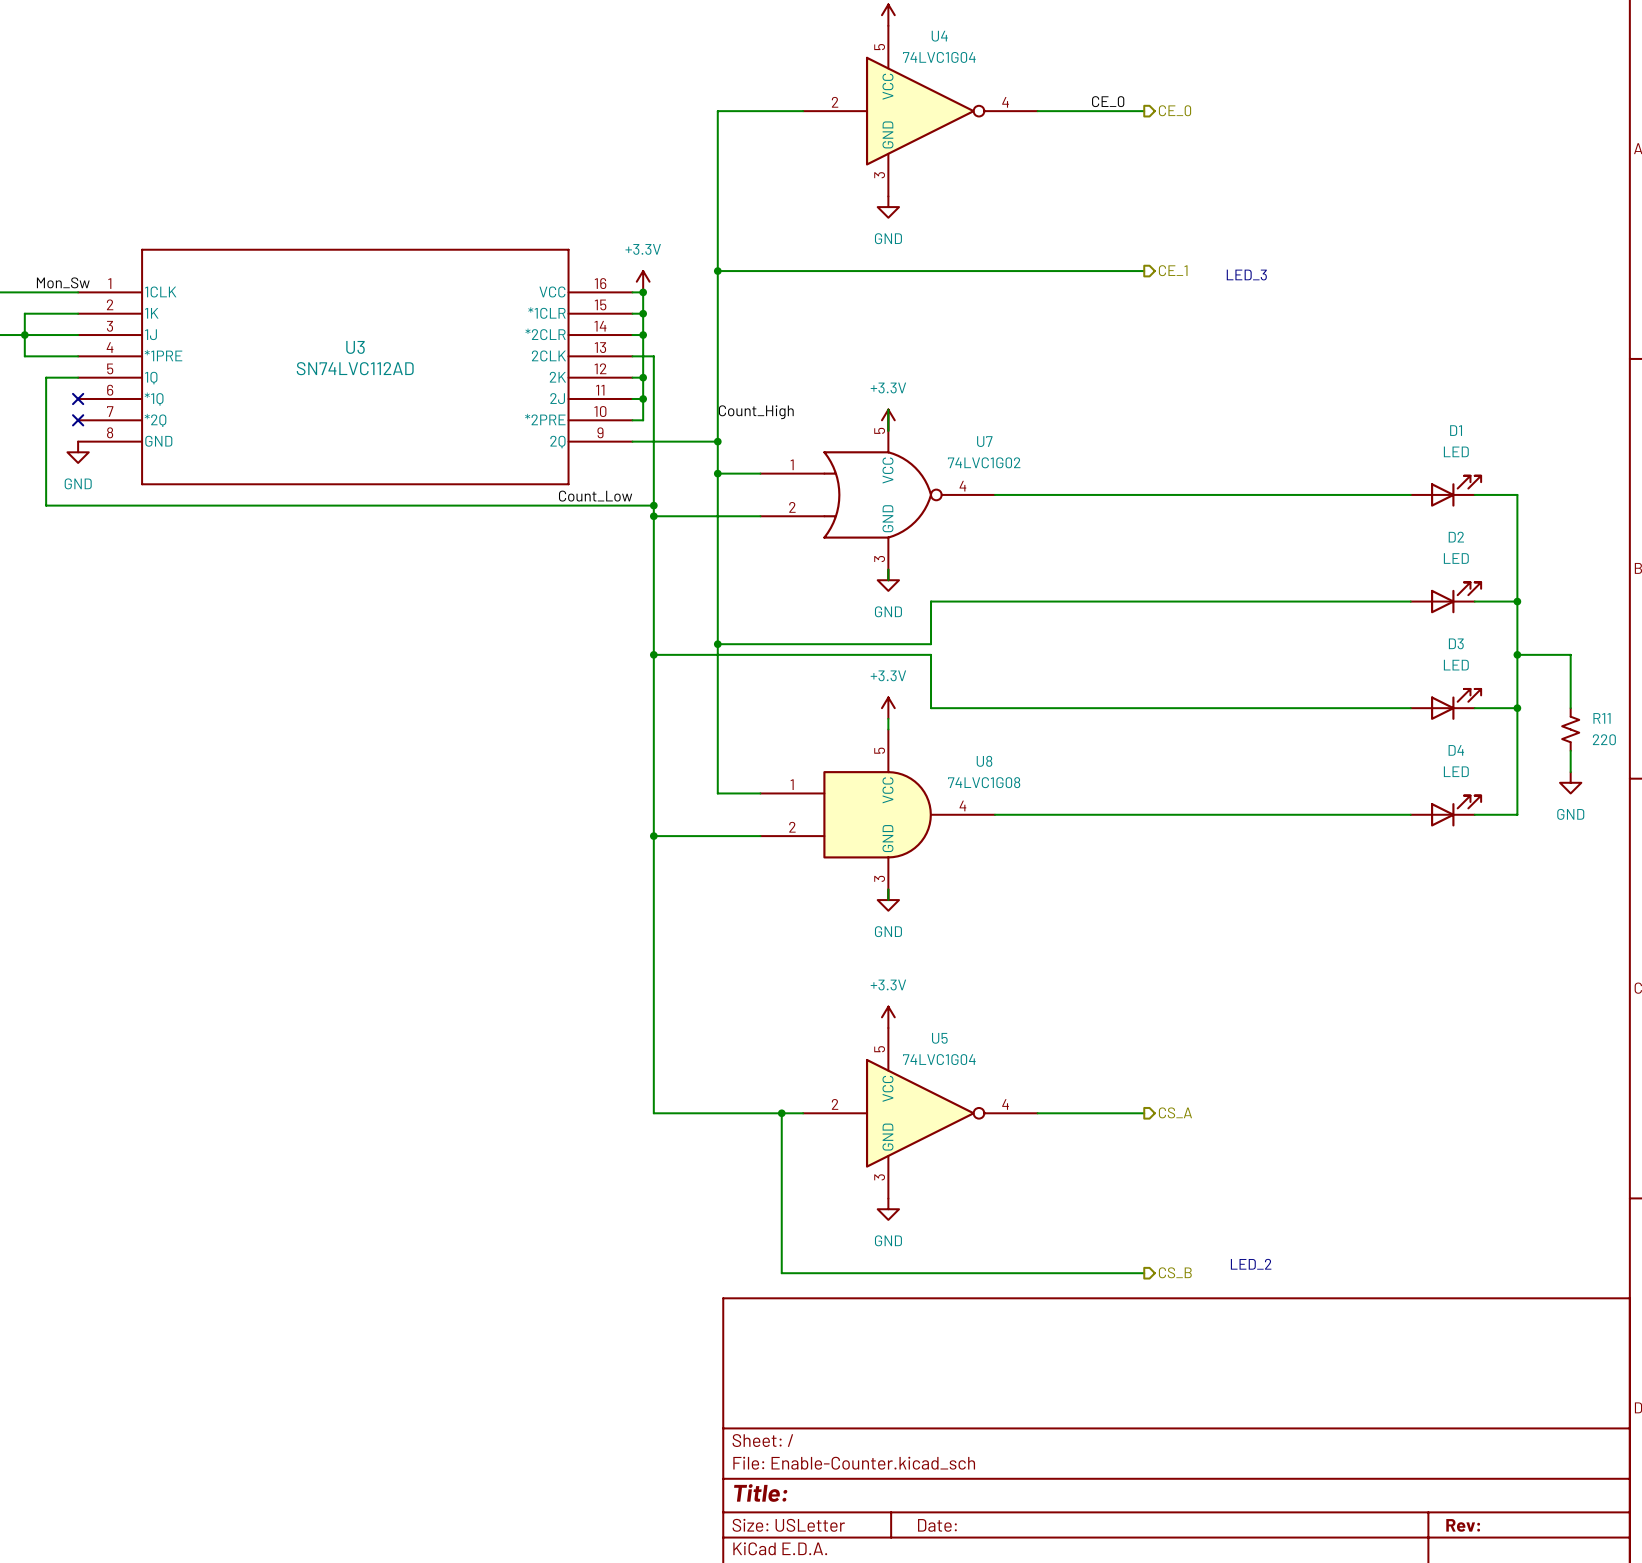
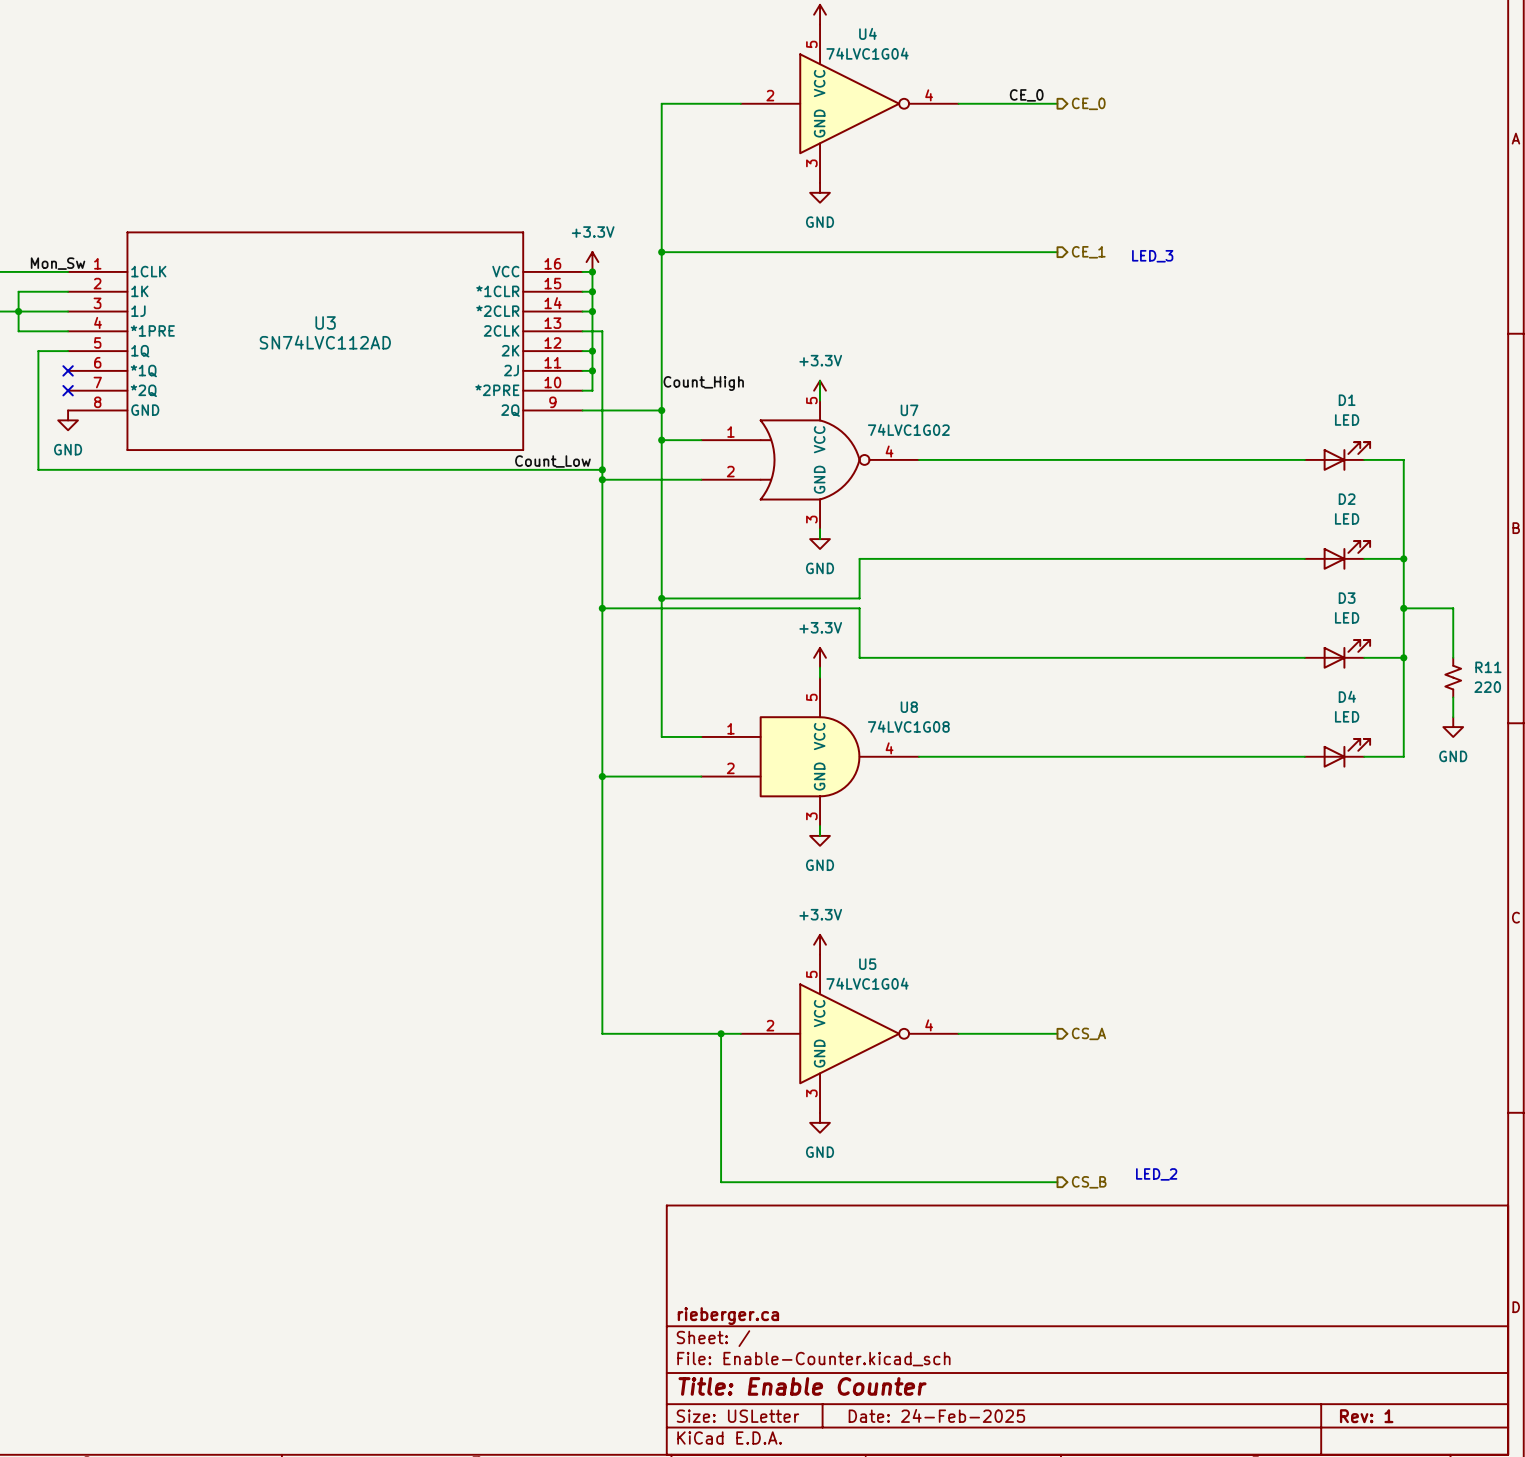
title block: none -> rieberger.ca (728, 1316)
title block: Title: (760, 1493) -> Title: Enable Counter (802, 1386)
title block: Date: (937, 1525) -> Date: 24-Feb-2025 (936, 1415)
title block: Rev: (1463, 1525) -> Rev: 1 (1366, 1416)

